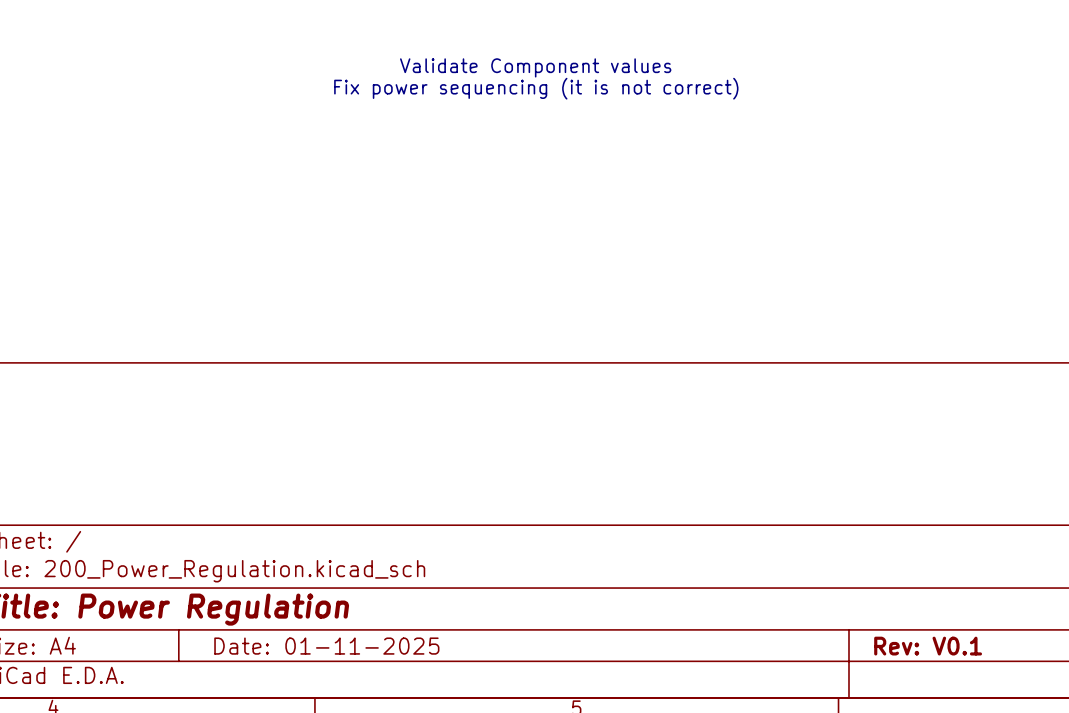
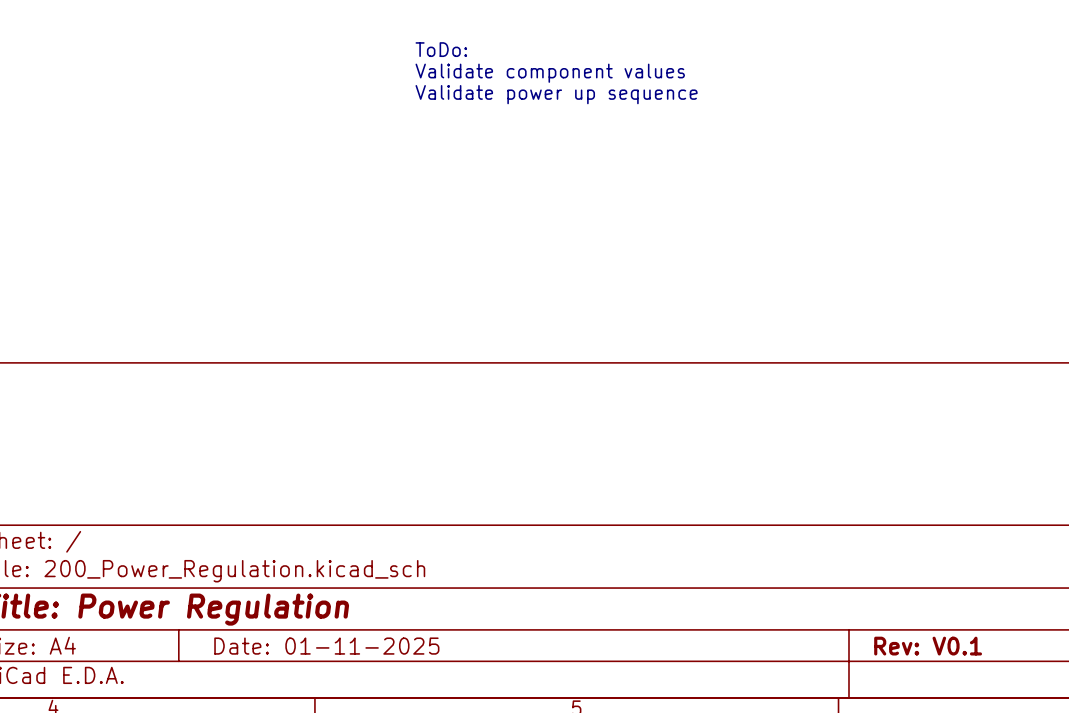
text: none -> ToDo: (441, 49)
text: Validate Component values (535, 67) -> Validate component values (550, 73)
text: Fix power sequencing (it is not correct) (536, 88) -> none
text: none -> Validate power up sequence (556, 94)

